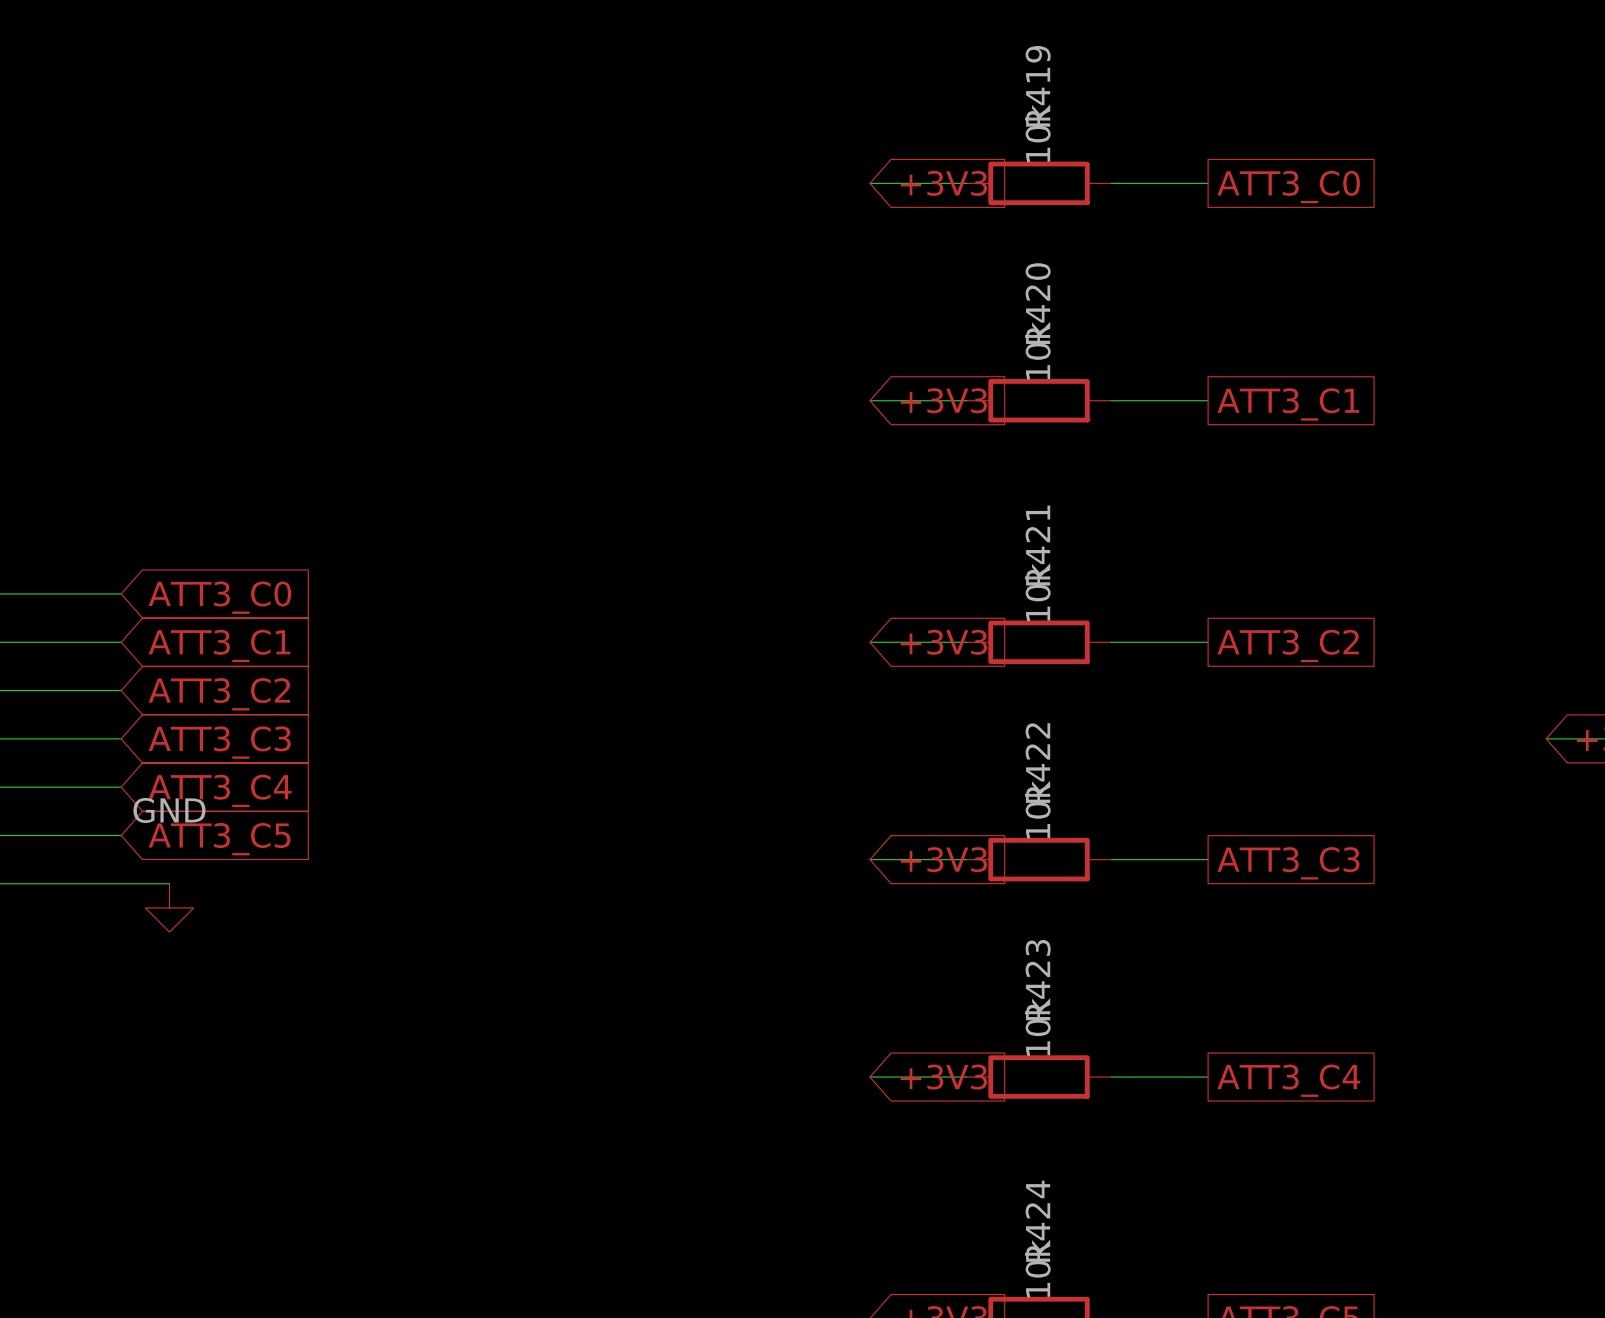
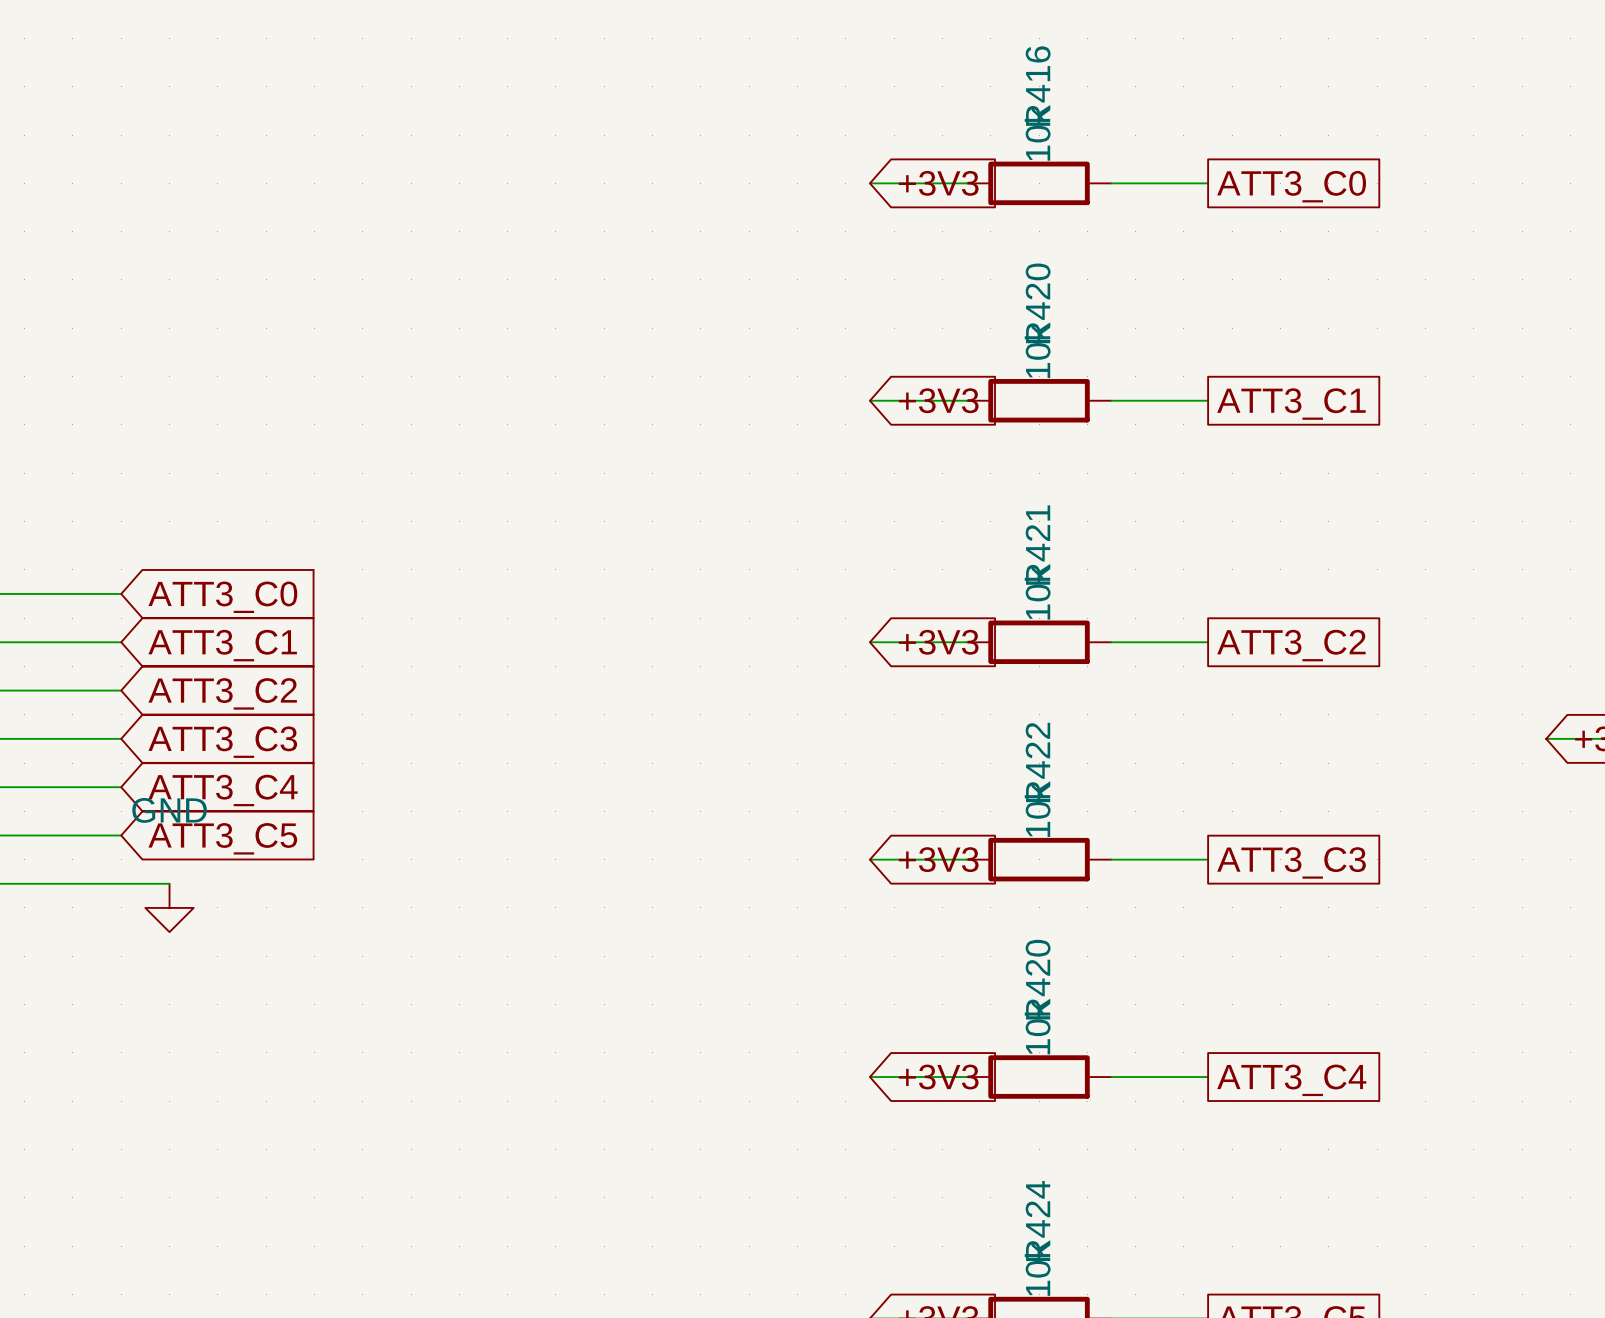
R419 name: R419 (1038, 86) -> R416 (1038, 86)
R423 name: R423 (1038, 980) -> R420 (1038, 979)

